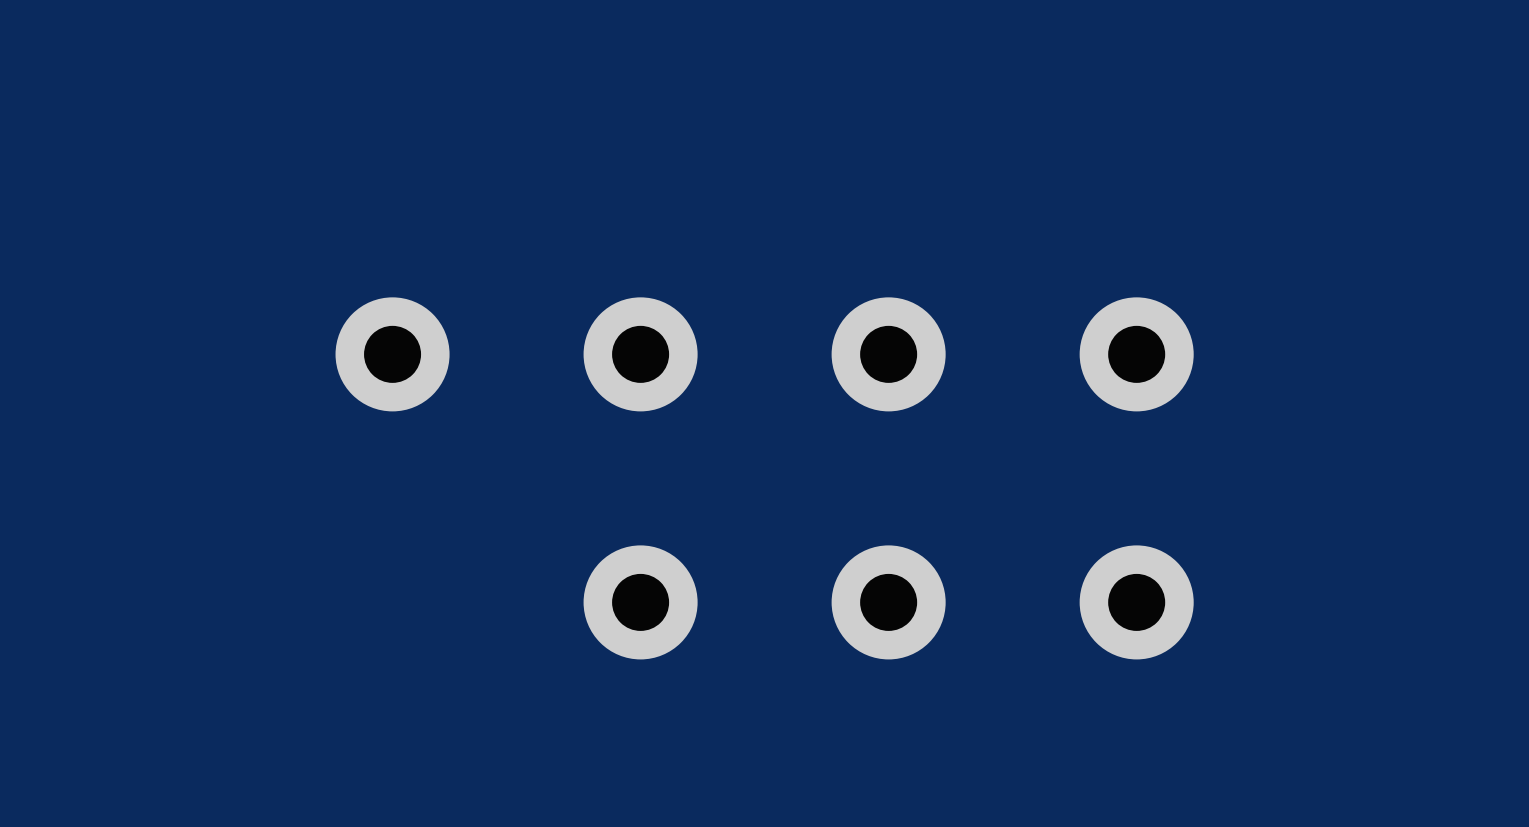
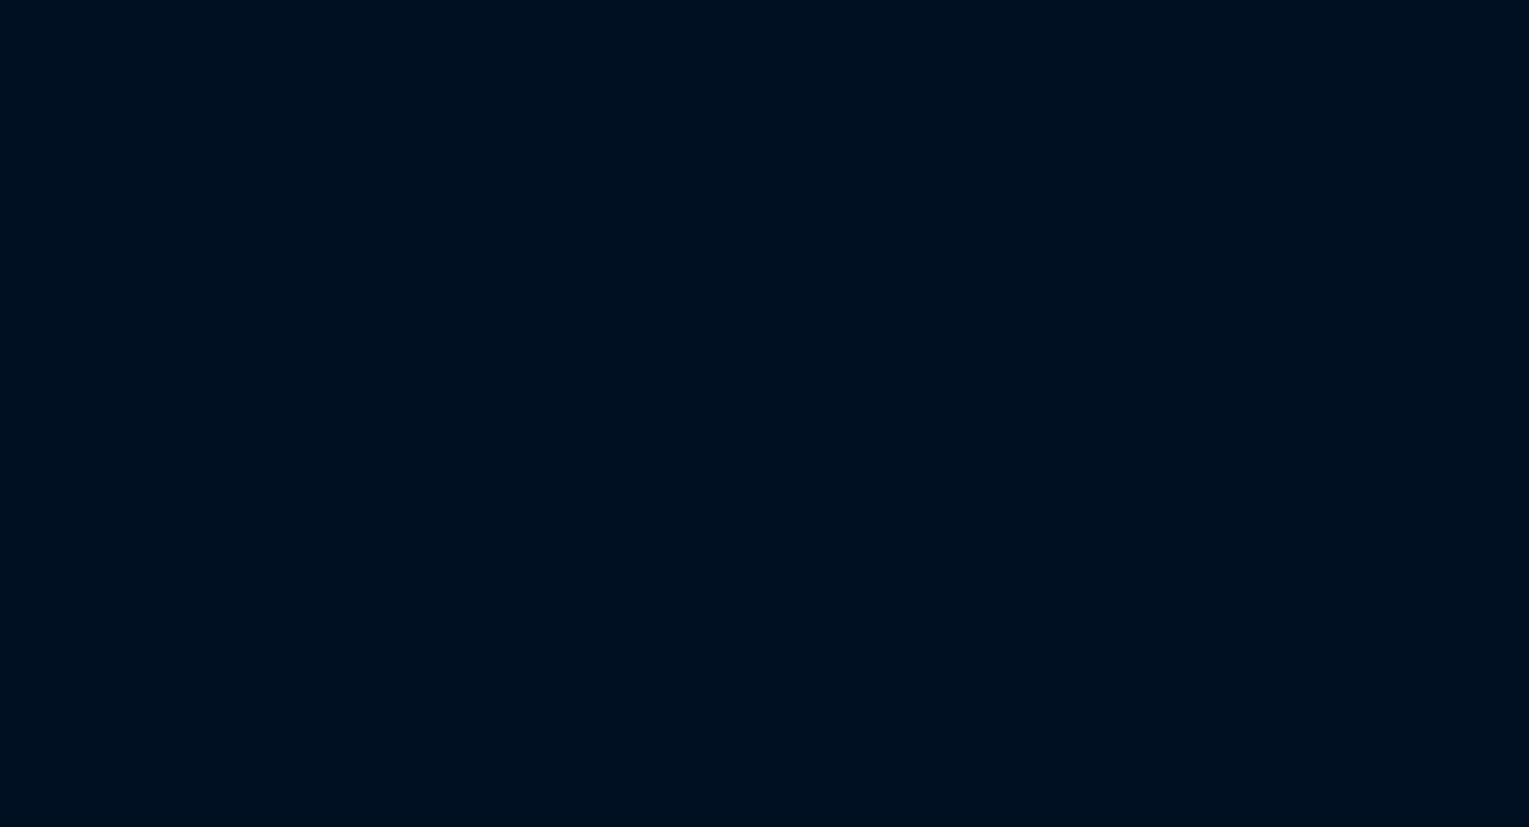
part: (392, 354) -> none
part: (640, 354) -> none
part: (888, 354) -> none
part: (1136, 354) -> none
part: (640, 602) -> none
part: (888, 602) -> none
part: (1136, 602) -> none

